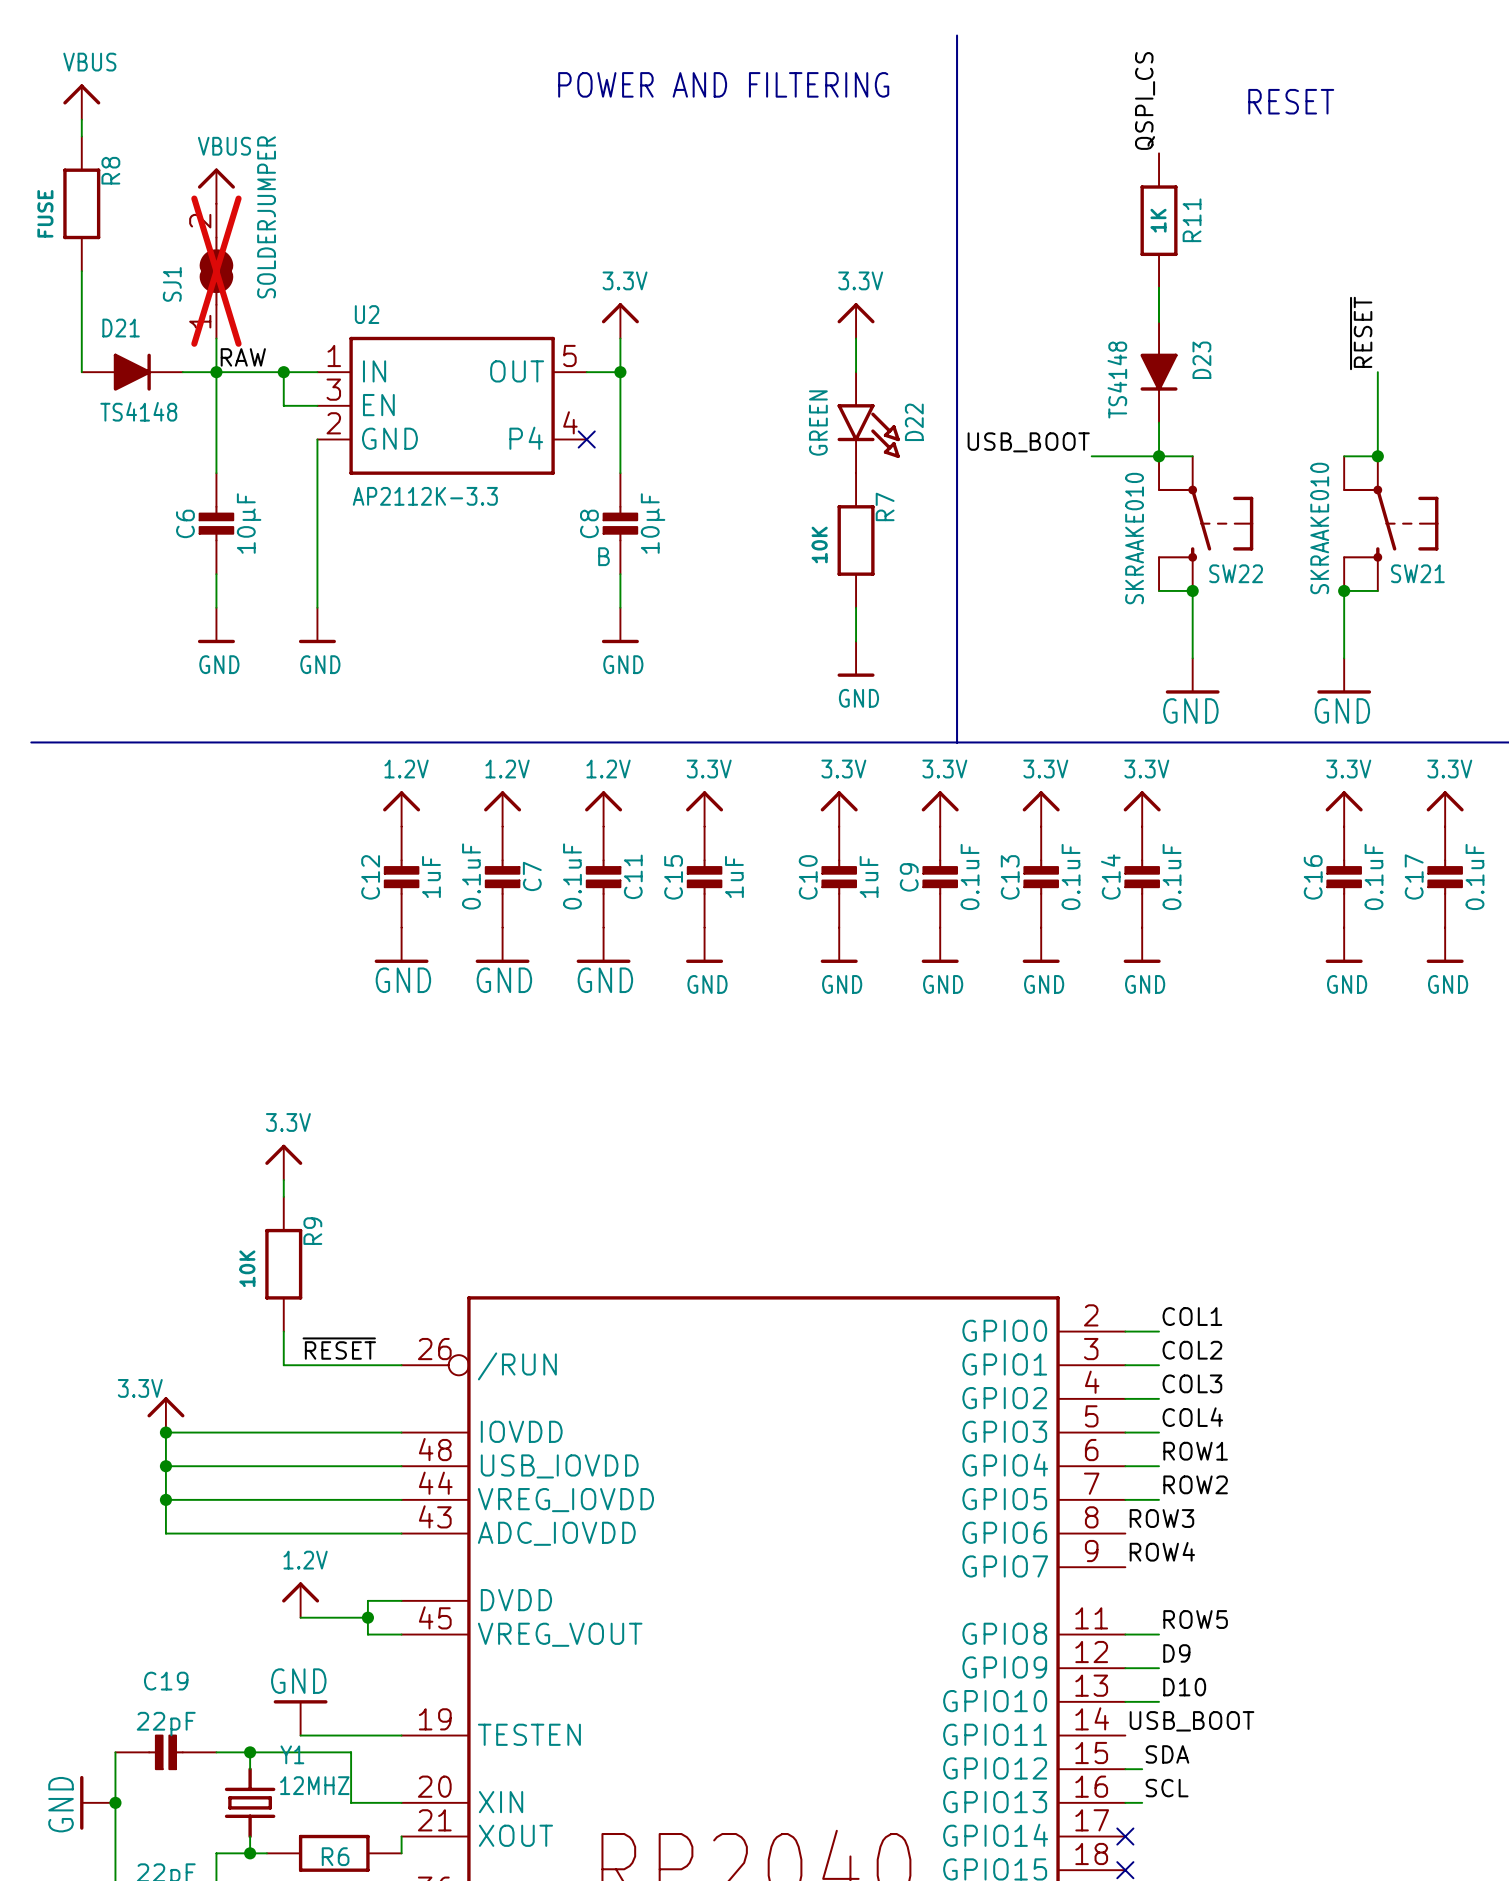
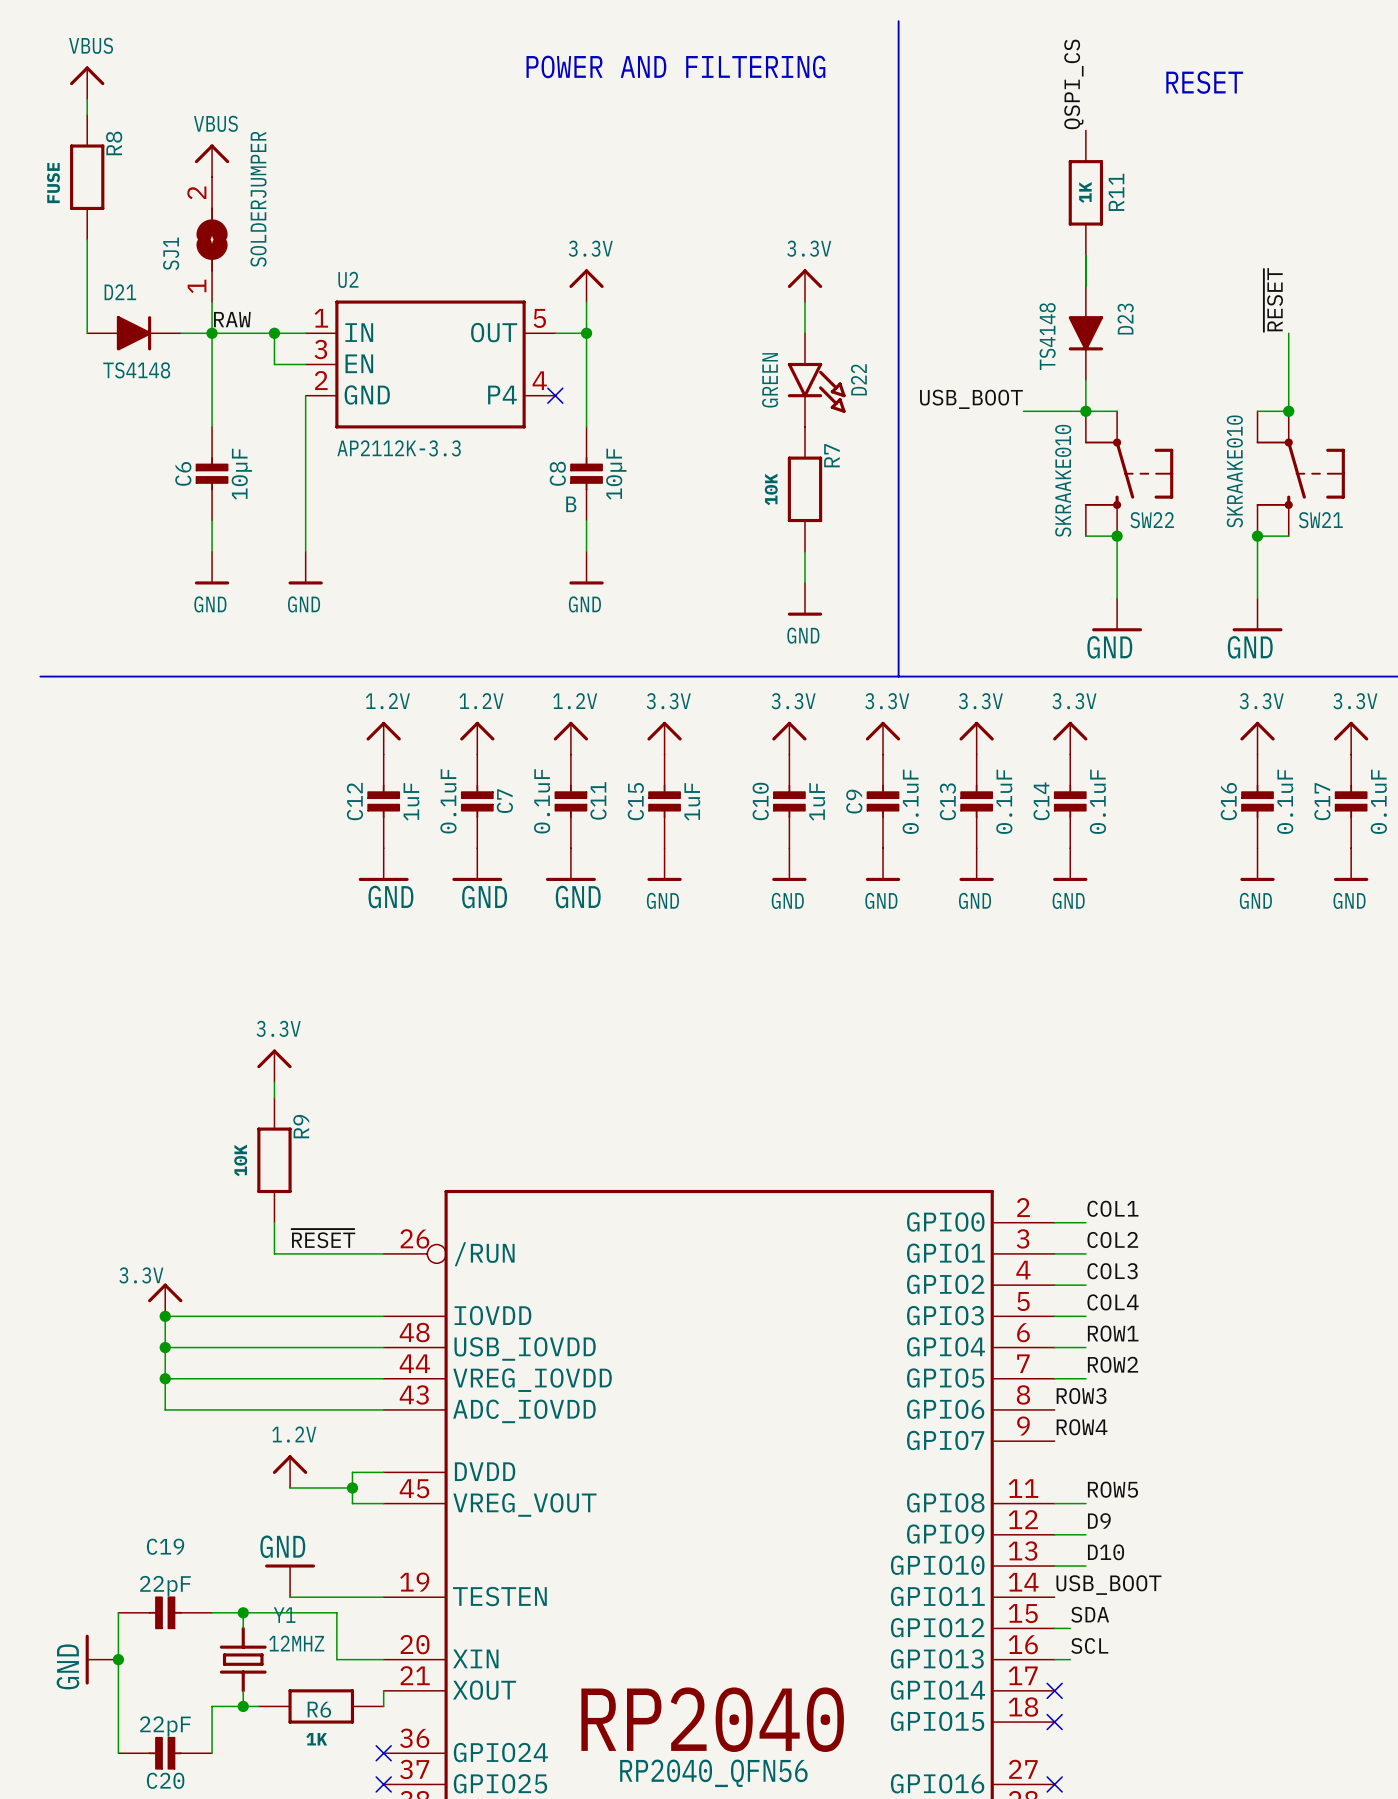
SJ1 do-not-place cross: (216, 271) -> none

